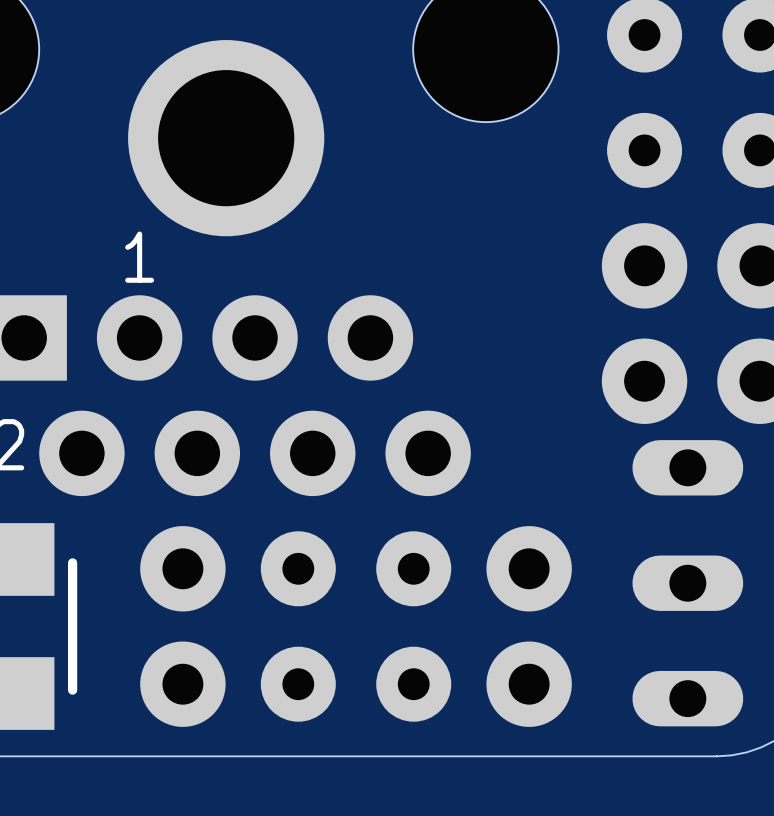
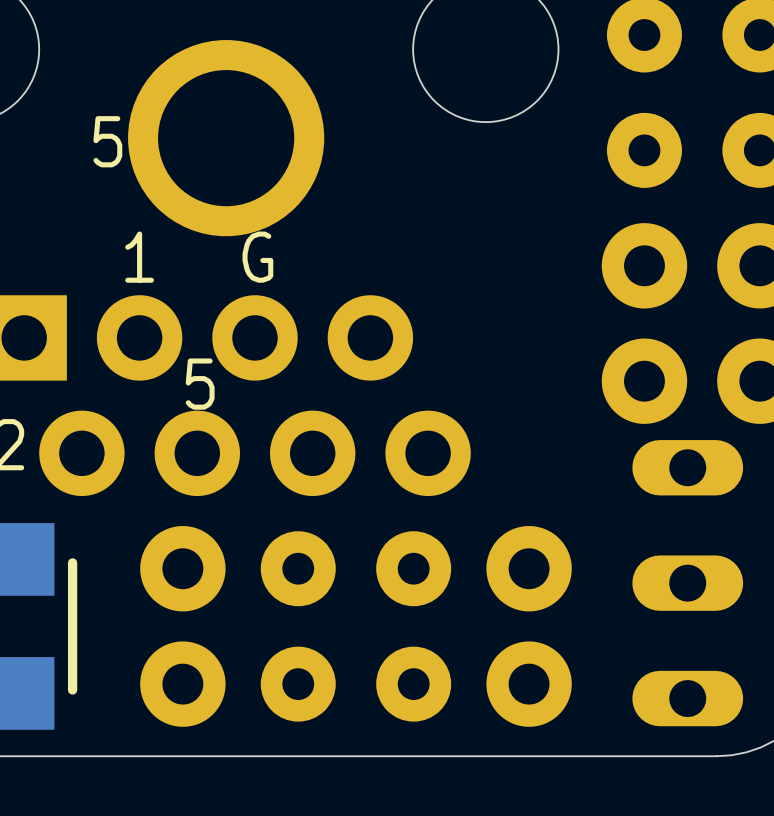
text: none -> 5 (107, 141)
text: none -> G (257, 257)
text: none -> 5 (200, 384)

